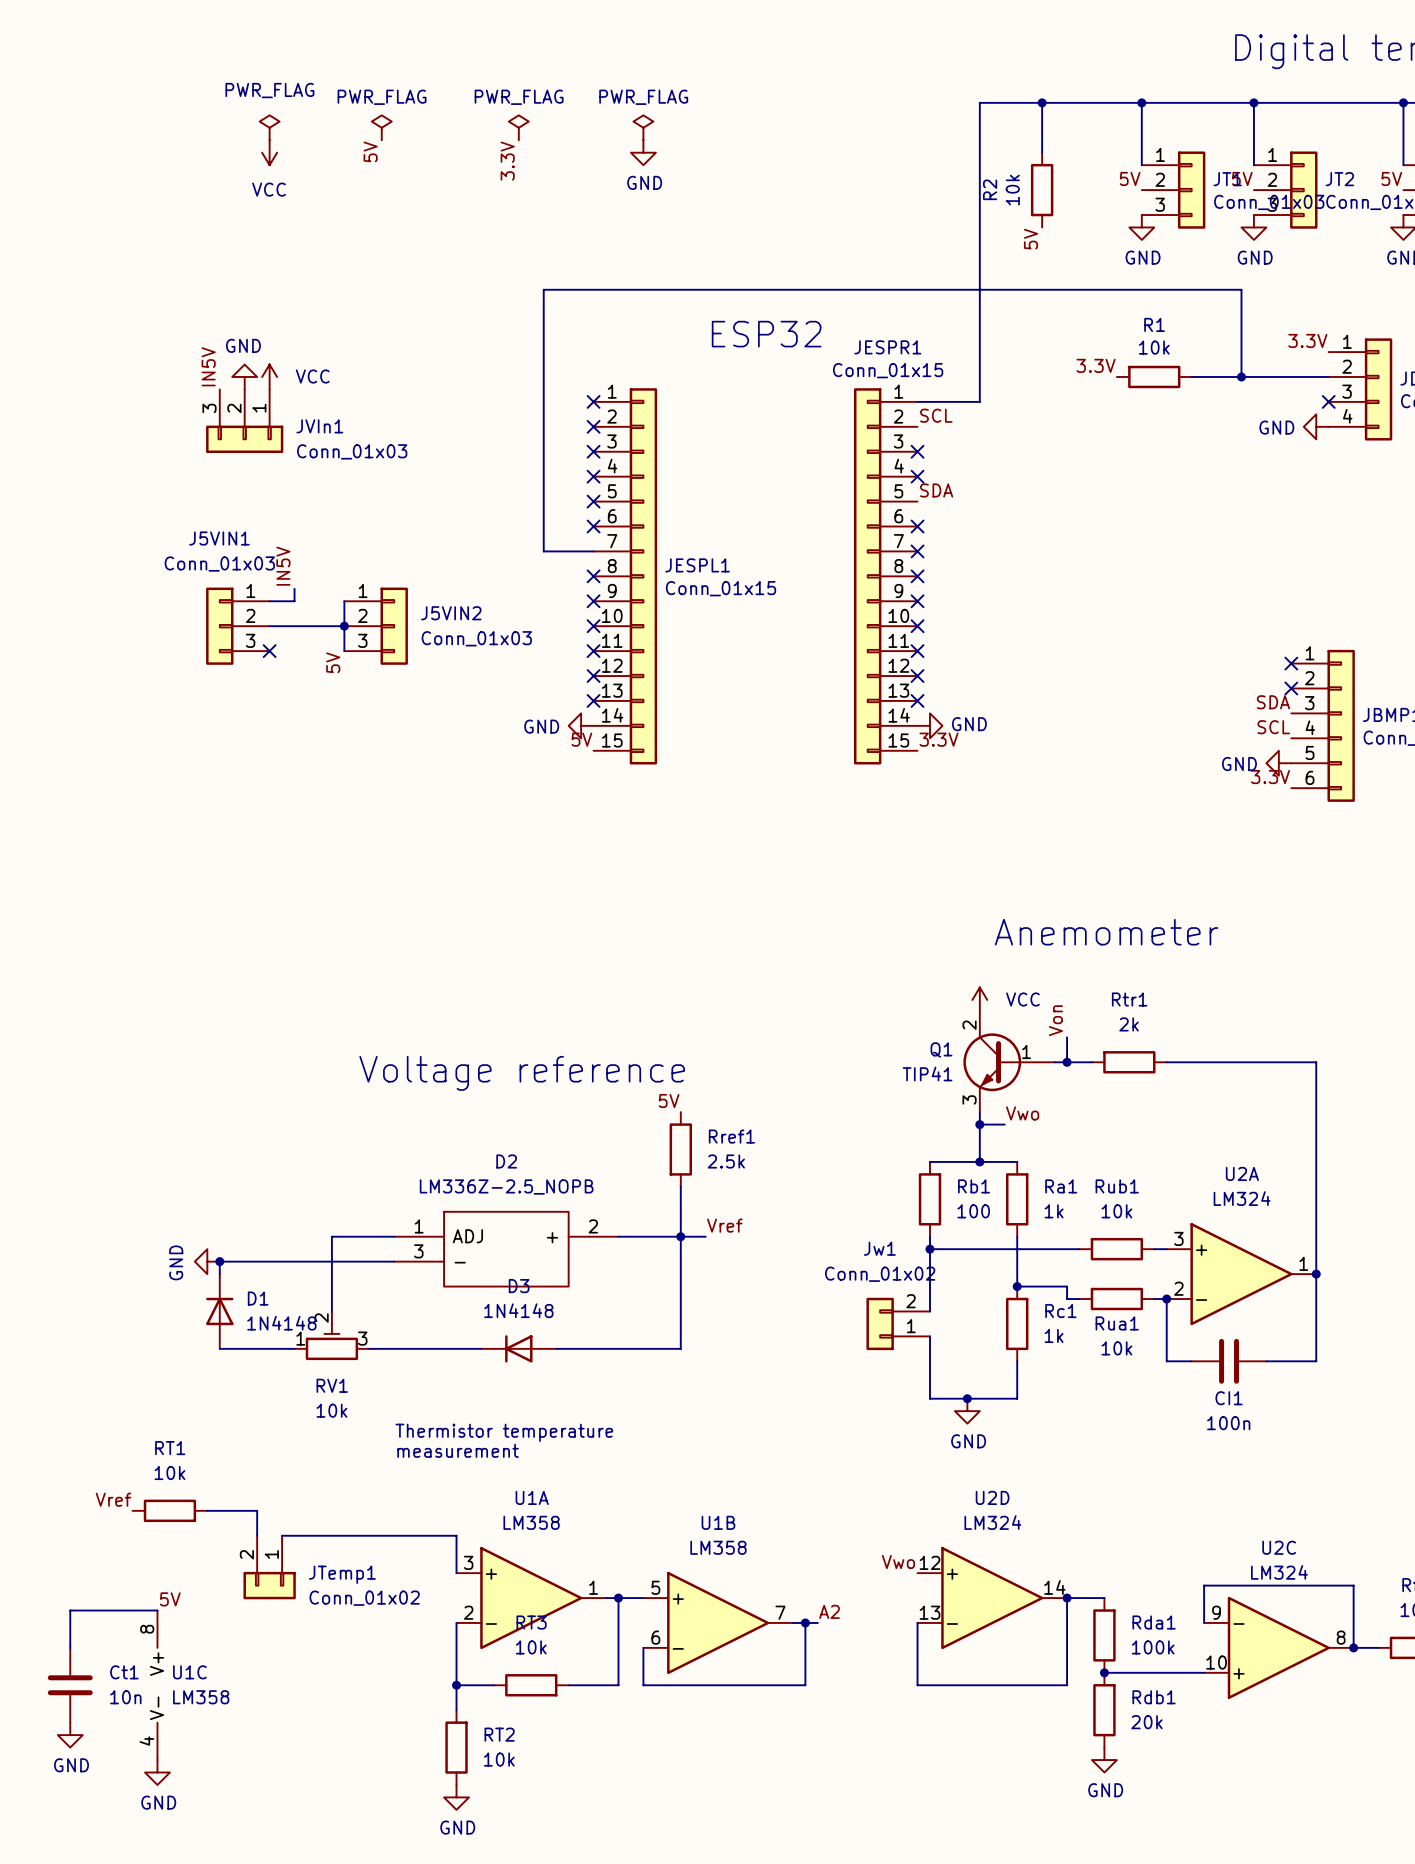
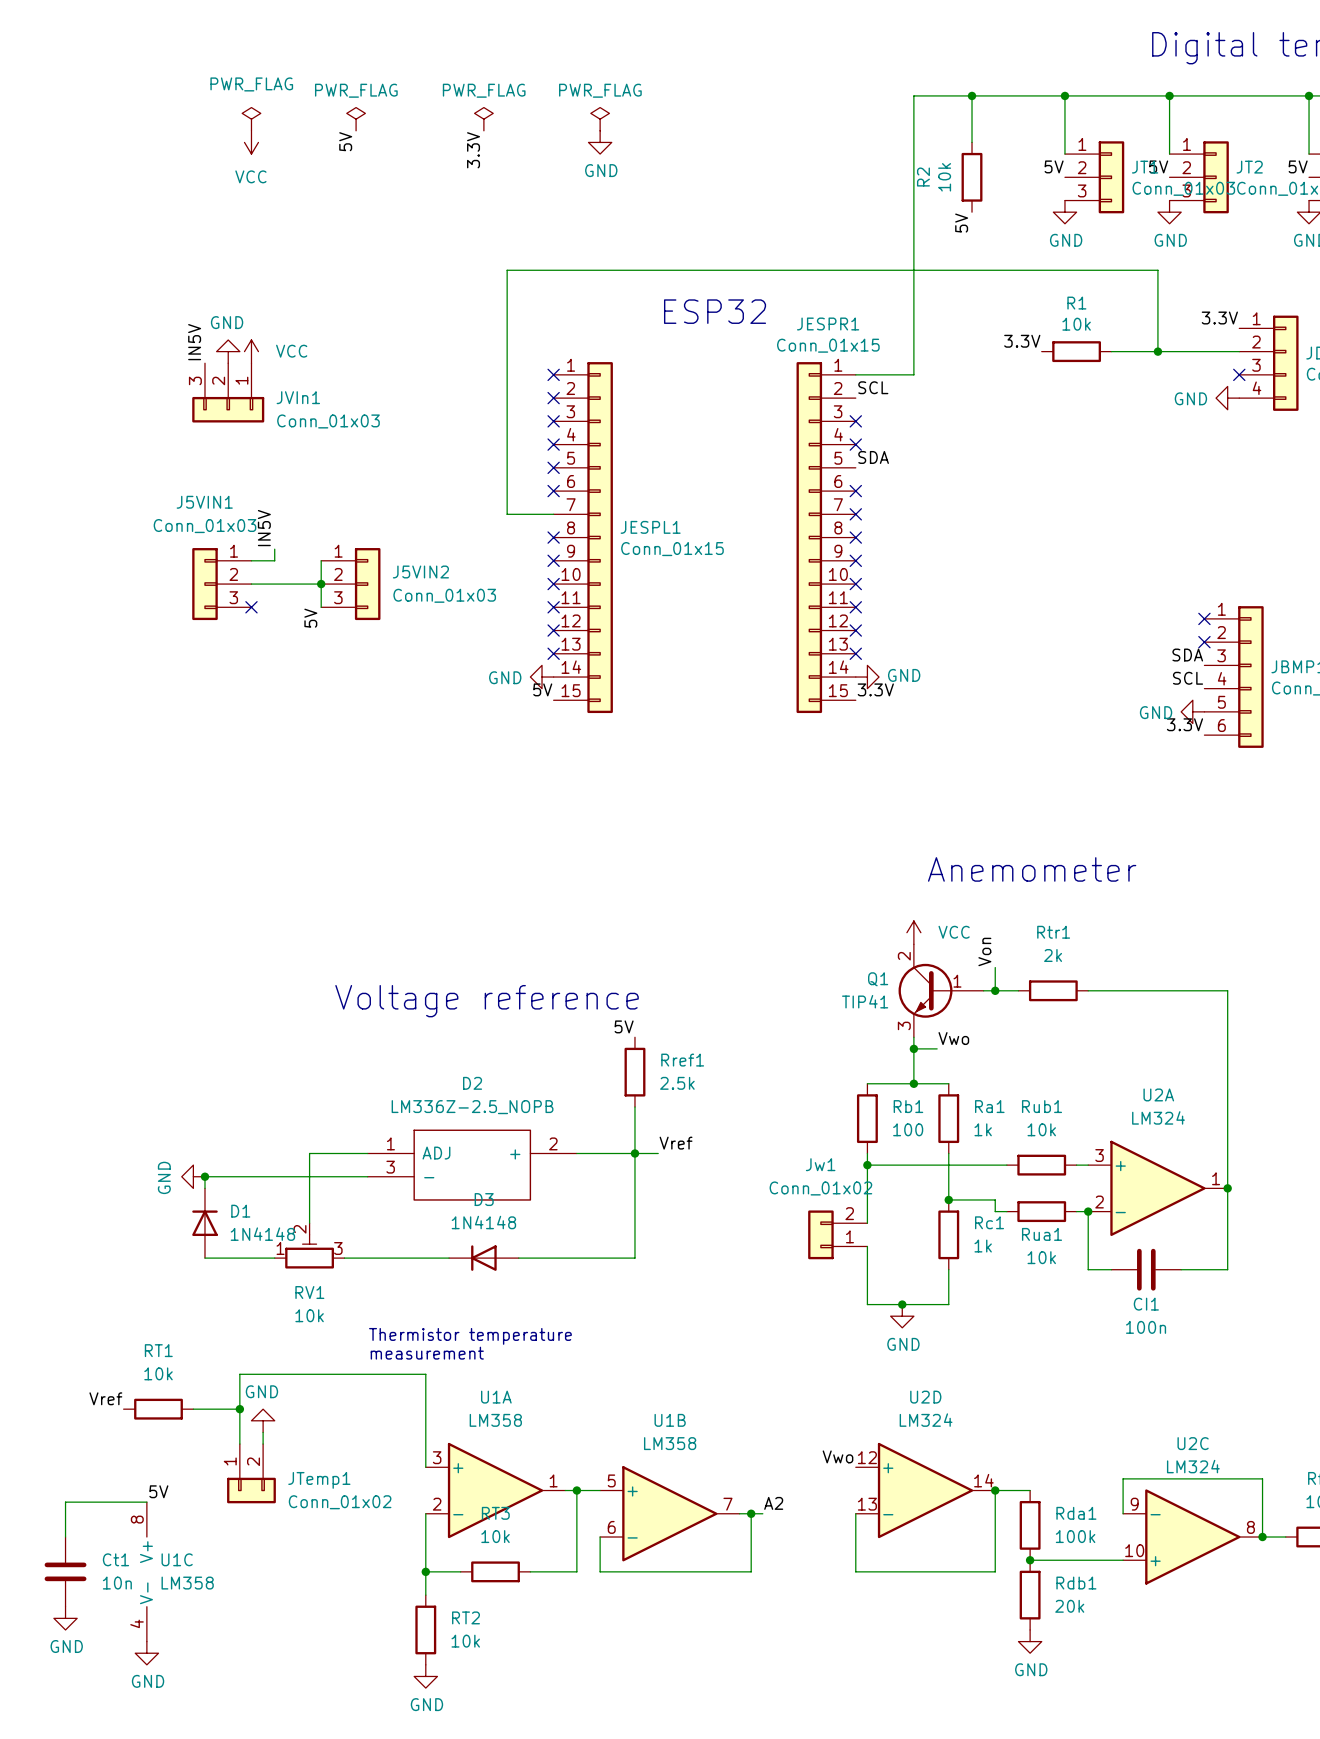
junction: none -> (239, 1409)
power symbol: none -> GND (263, 1420)
wire: (282, 1535) (456, 1535) -> (239, 1409) (239, 1374) (425, 1374) (425, 1432)
JTemp1 flip: as is (269, 1585) -> left-right (251, 1490)

